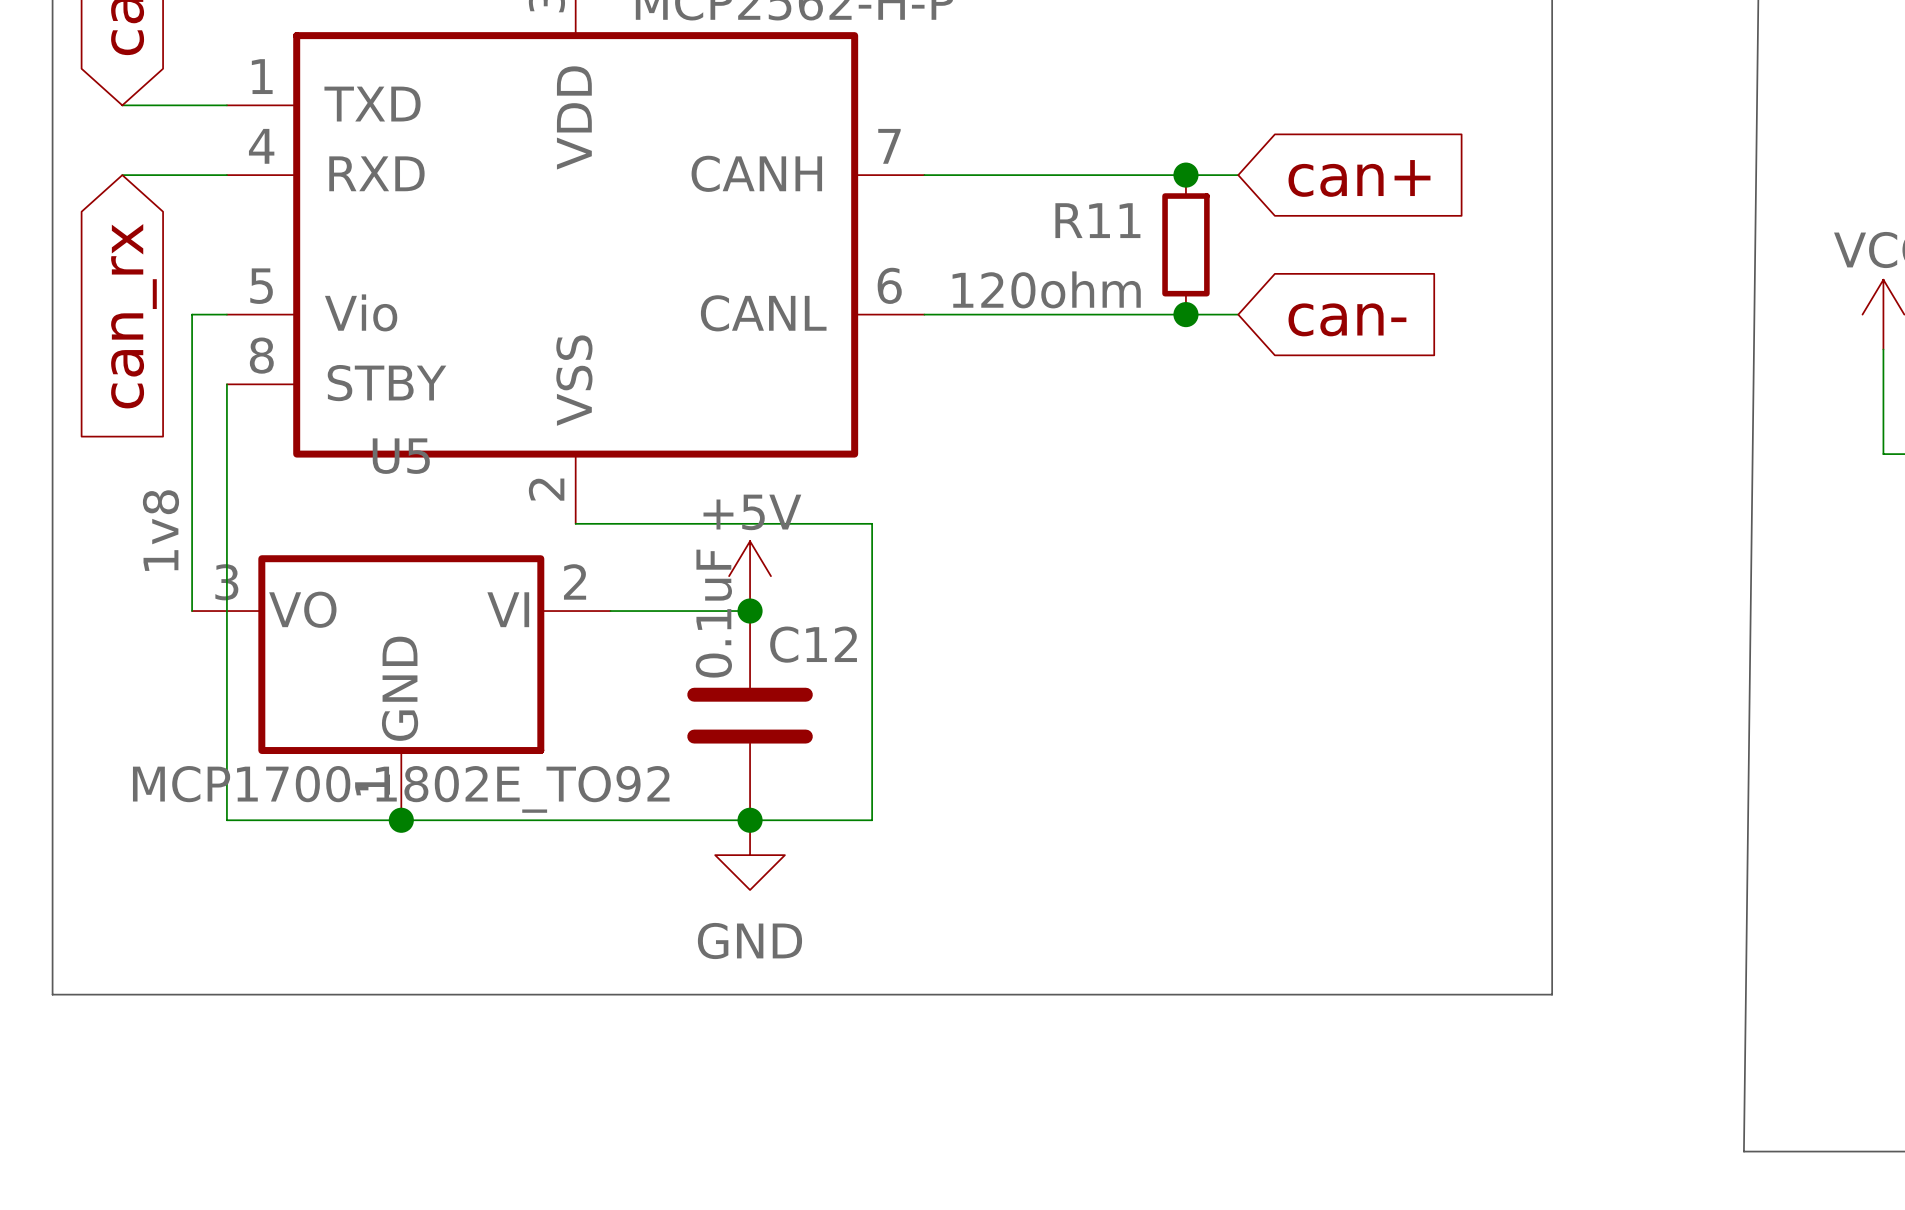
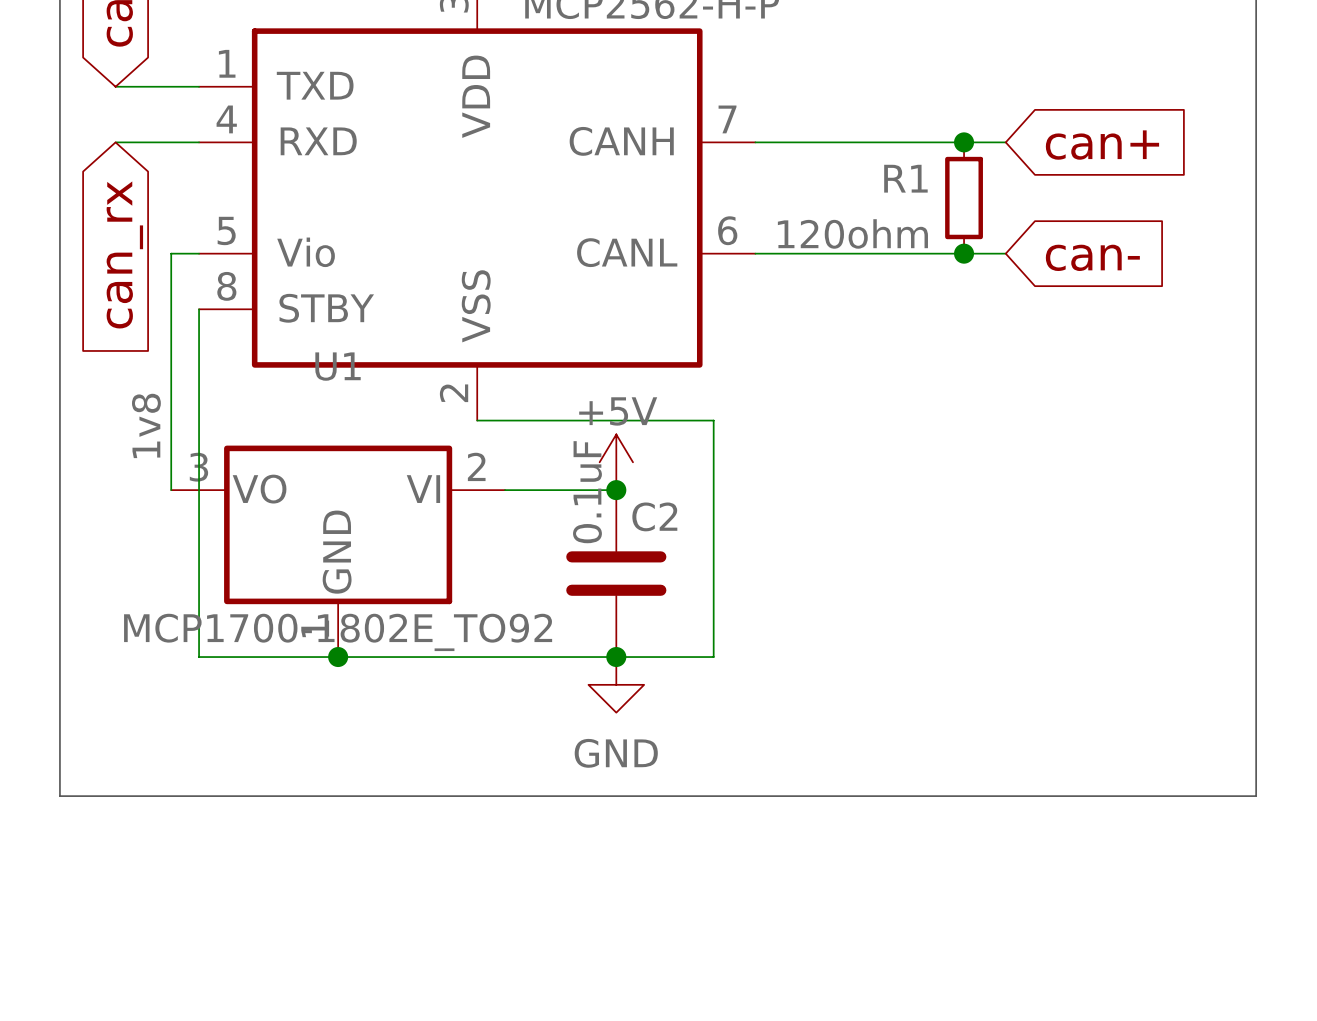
R11 name: R11 (1097, 220) -> R1 (905, 178)
U5 name: U5 (401, 456) -> U1 (338, 366)
C12 name: C12 (813, 644) -> C2 (654, 516)

